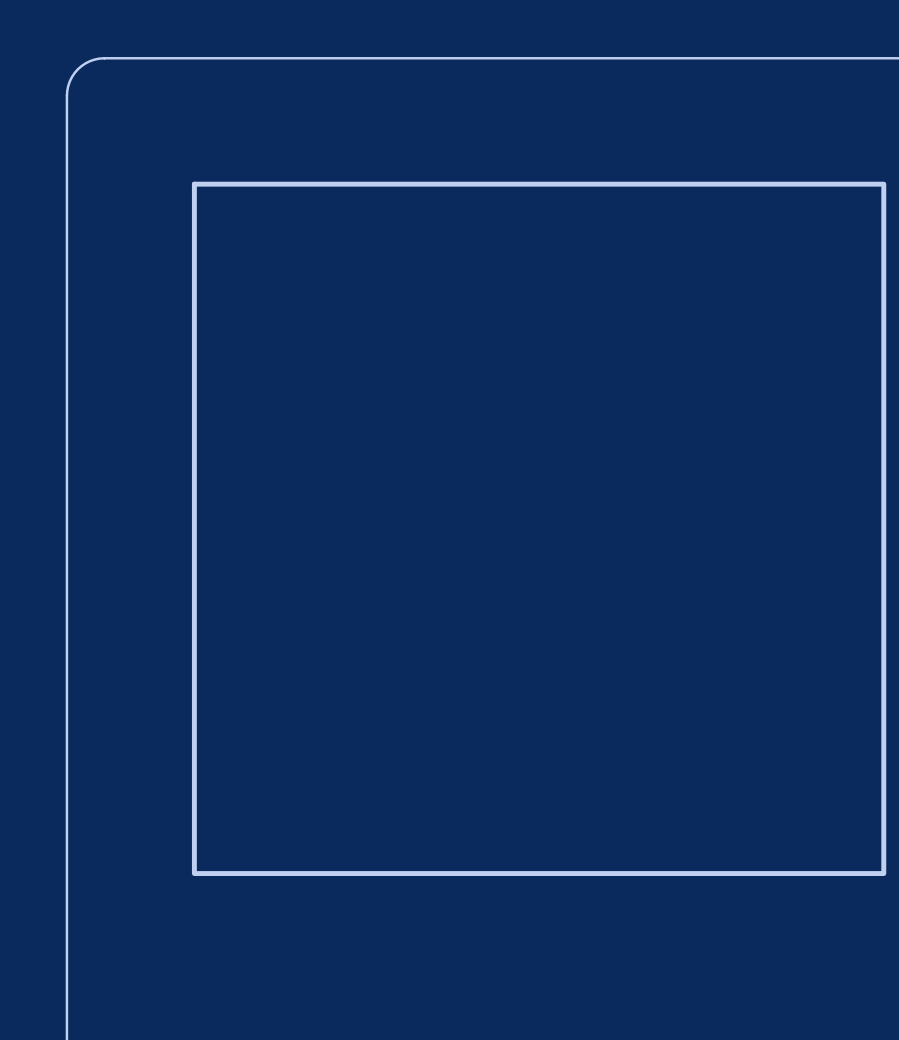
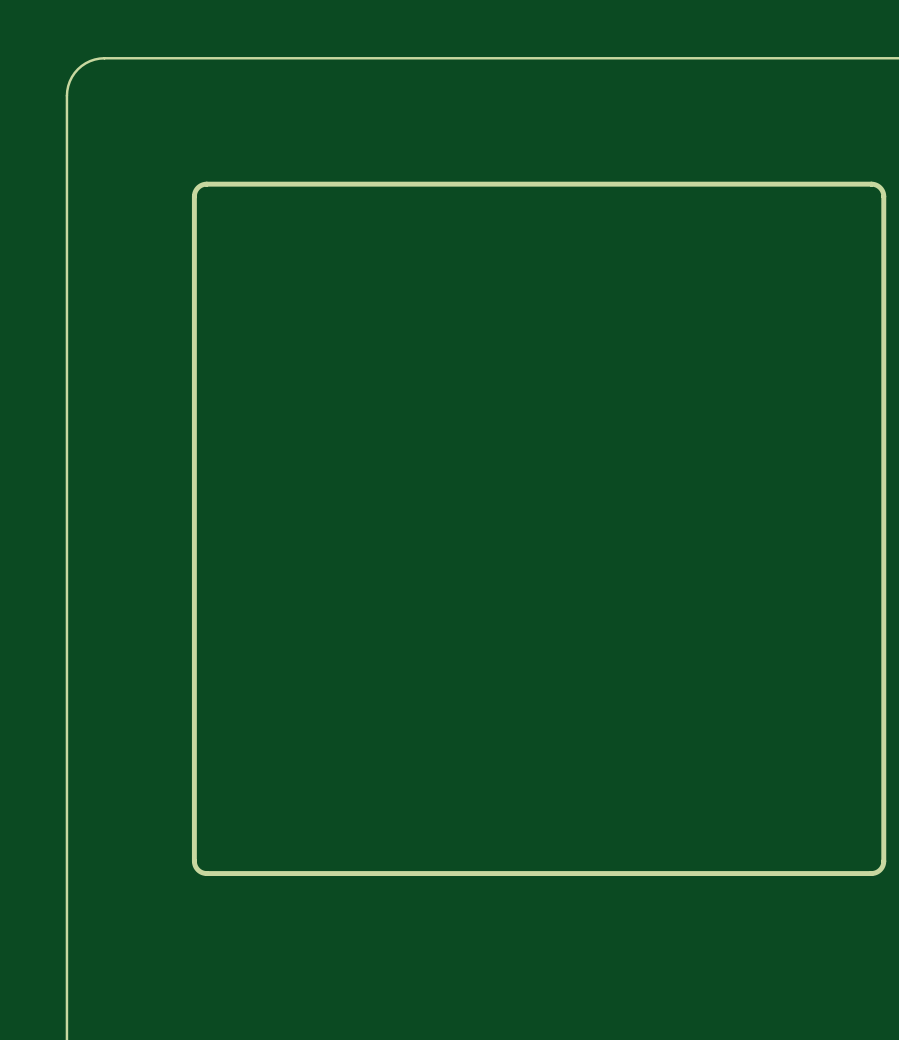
drawing shape: [191, 181, 887, 877] -> [191, 181, 887, 877]

